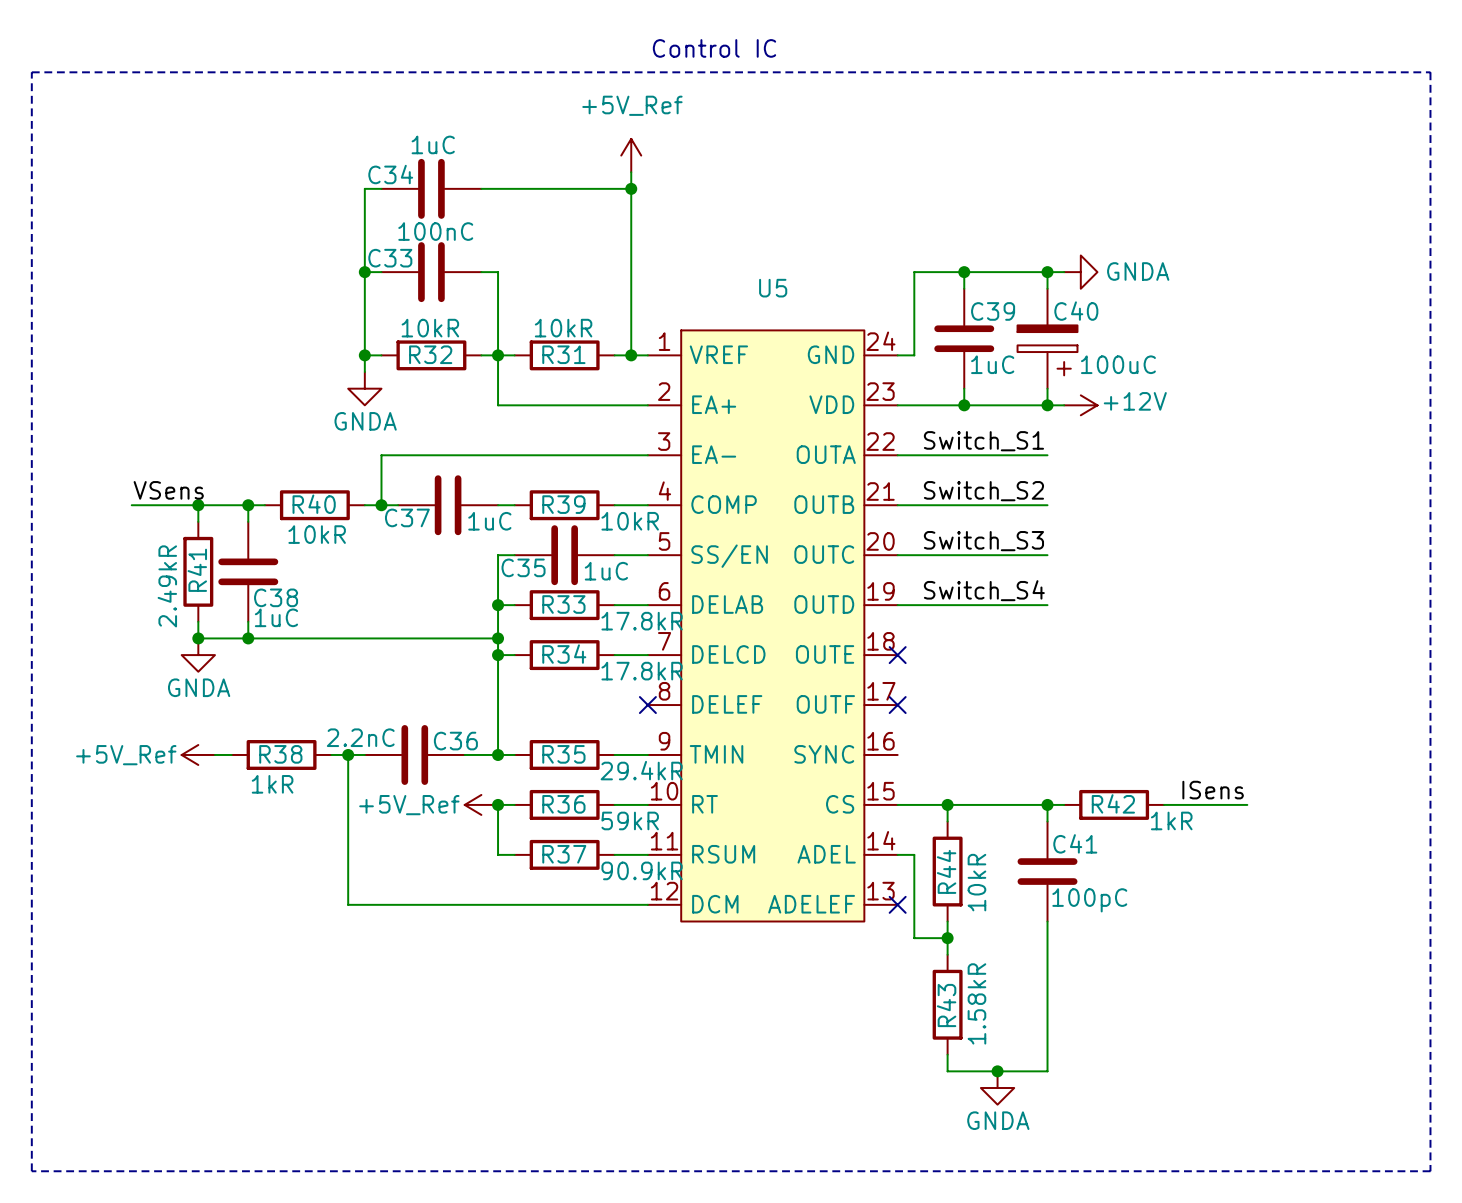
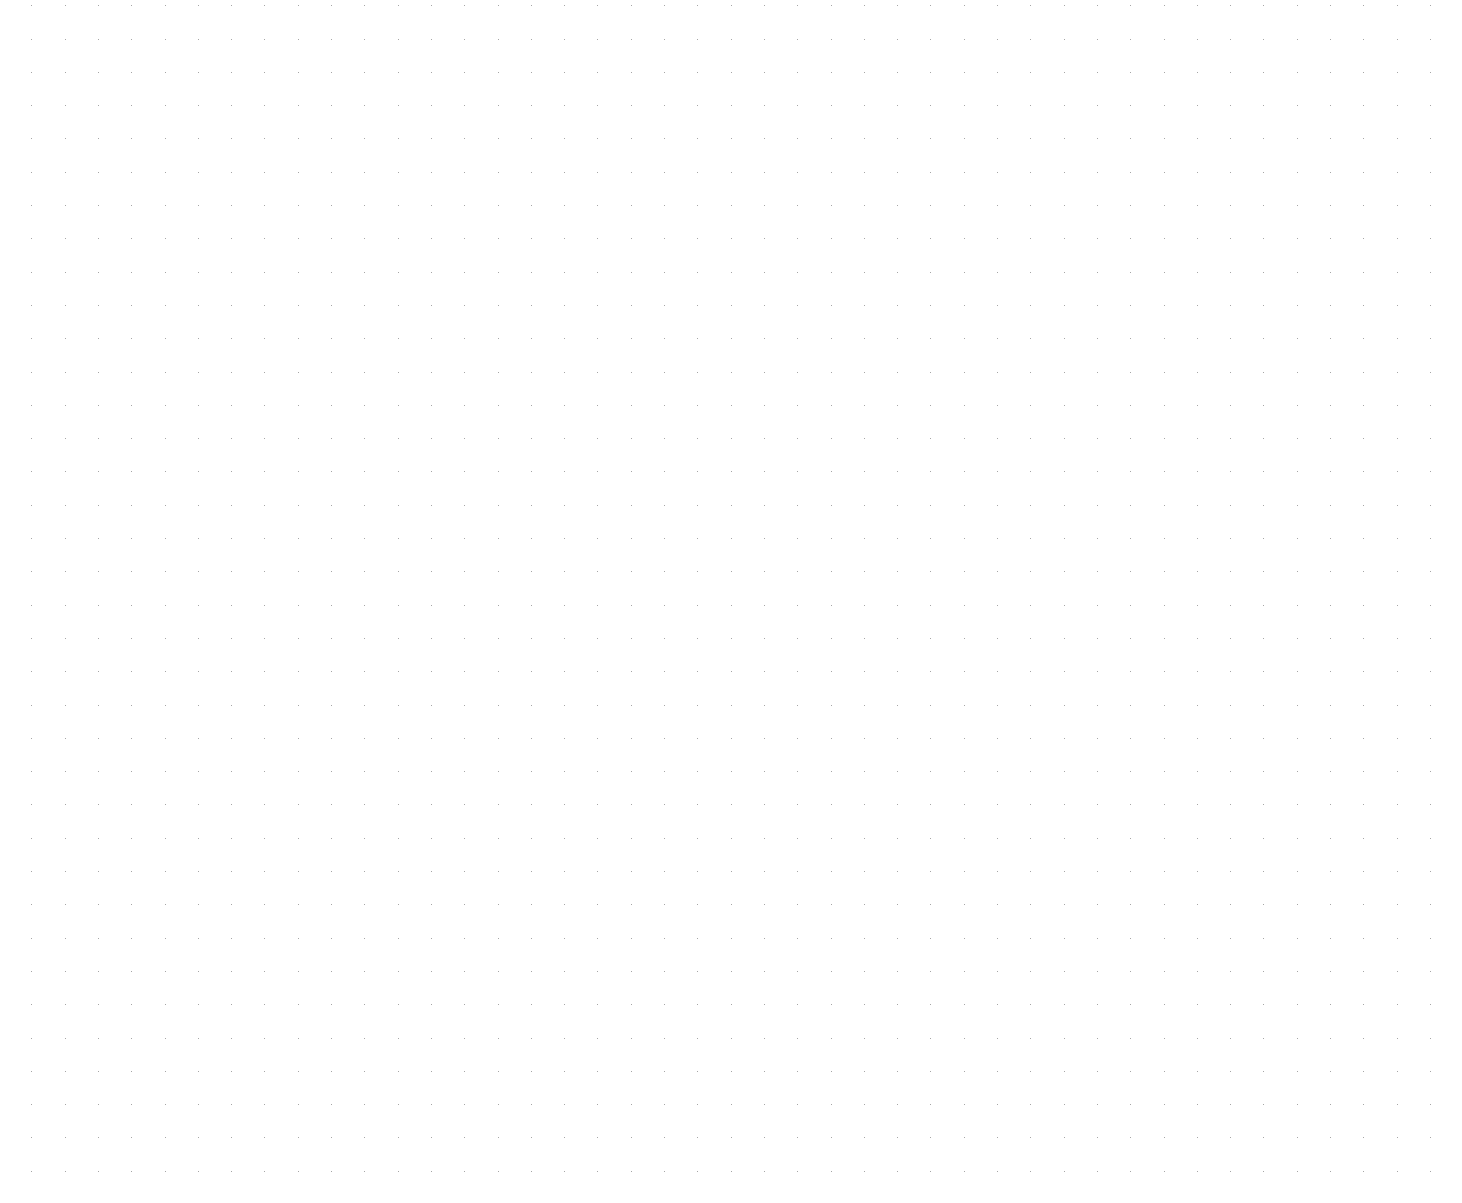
text: Control IC (714, 48) -> none
line: (31, 72) (1430, 72) (1430, 1171) (31, 1171) (31, 72) -> none
power symbol: +5V_Ref (631, 155) -> none
wire: (631, 172) (631, 355) -> none
wire: (381, 188) (364, 188) (364, 372) -> none
C34: 1uC (431, 188) -> none
wire: (481, 188) (631, 188) -> none
junction: (631, 188) -> none
wire: (364, 272) (381, 272) -> none
junction: (364, 272) -> none
C33: 100nC (431, 272) -> none
wire: (481, 272) (498, 272) (498, 405) (647, 405) -> none
wire: (964, 272) (964, 288) -> none
junction: (964, 272) -> none
wire: (1047, 272) (1047, 288) -> none
junction: (1047, 272) -> none
wire: (1064, 272) (914, 272) (914, 355) (897, 355) -> none
power symbol: GNDA (1080, 272) -> none
C39: 1uC (964, 338) -> none
C40: 100uC (1047, 338) -> none
wire: (364, 355) (381, 355) -> none
junction: (364, 355) -> none
R32: 10kR (431, 355) -> none
wire: (481, 355) (514, 355) -> none
junction: (498, 355) -> none
R31: 10kR (564, 355) -> none
wire: (614, 355) (647, 355) -> none
junction: (631, 355) -> none
power symbol: GNDA (364, 388) -> none
wire: (964, 388) (964, 405) -> none
wire: (1047, 388) (1047, 405) -> none
wire: (897, 405) (1064, 405) -> none
junction: (964, 405) -> none
junction: (1047, 405) -> none
power symbol: +12V (1080, 405) -> none
label: Switch_S1 (983, 441) -> none
wire: (647, 455) (381, 455) (381, 505) -> none
wire: (897, 455) (1047, 455) -> none
label: VSens (168, 490) -> none
label: Switch_S2 (983, 491) -> none
wire: (131, 505) (264, 505) -> none
wire: (198, 505) (198, 521) -> none
junction: (198, 505) -> none
wire: (248, 505) (248, 521) -> none
junction: (248, 505) -> none
R40: 10kR (314, 505) -> none
wire: (364, 505) (398, 505) -> none
junction: (381, 505) -> none
C37: 1uC (448, 505) -> none
wire: (498, 505) (514, 505) -> none
R39: 10kR (564, 505) -> none
wire: (614, 505) (647, 505) -> none
wire: (897, 505) (1047, 505) -> none
label: Switch_S3 (983, 541) -> none
wire: (514, 555) (498, 555) (498, 754) -> none
C35: 1uC (564, 555) -> none
wire: (614, 555) (647, 555) -> none
wire: (897, 555) (1047, 555) -> none
R41: 2.49kR (198, 571) -> none
C38: 1uC (248, 571) -> none
label: Switch_S4 (984, 590) -> none
wire: (498, 605) (514, 605) -> none
junction: (498, 605) -> none
R33: 17.8kR (564, 605) -> none
wire: (614, 605) (647, 605) -> none
wire: (897, 605) (1047, 605) -> none
wire: (198, 621) (198, 638) (498, 638) -> none
wire: (248, 621) (248, 638) -> none
U5: (772, 625) -> none
junction: (198, 638) -> none
junction: (248, 638) -> none
junction: (498, 638) -> none
power symbol: GNDA (198, 655) -> none
wire: (498, 655) (514, 655) -> none
junction: (498, 655) -> none
R34: 17.8kR (564, 655) -> none
wire: (614, 655) (647, 655) -> none
no-connect mark: (897, 655) -> none
no-connect mark: (647, 705) -> none
no-connect mark: (897, 705) -> none
power symbol: +5V_Ref (198, 754) -> none
wire: (214, 754) (231, 754) -> none
R38: 1kR (281, 754) -> none
wire: (331, 754) (364, 754) -> none
wire: (348, 754) (348, 904) (647, 904) -> none
junction: (348, 754) -> none
C36: 2.2nC (414, 754) -> none
wire: (464, 754) (514, 754) -> none
junction: (498, 754) -> none
R35: 29.4kR (564, 754) -> none
wire: (614, 754) (647, 754) -> none
label: ISens (1213, 790) -> none
power symbol: +5V_Ref (481, 804) -> none
junction: (498, 804) -> none
wire: (514, 804) (498, 804) (498, 854) (514, 854) -> none
R36: 59kR (564, 804) -> none
wire: (614, 804) (647, 804) -> none
wire: (897, 804) (1064, 804) -> none
wire: (947, 804) (947, 821) -> none
junction: (947, 804) -> none
wire: (1047, 804) (1047, 821) -> none
junction: (1047, 804) -> none
R42: 1kR (1114, 804) -> none
wire: (1164, 804) (1247, 804) -> none
R37: 90.9kR (564, 854) -> none
wire: (614, 854) (647, 854) -> none
wire: (897, 854) (914, 854) (914, 938) (947, 938) -> none
R44: 10kR (947, 871) -> none
C41: 100pC (1047, 871) -> none
no-connect mark: (897, 904) -> none
wire: (947, 921) (947, 954) -> none
wire: (1047, 921) (1047, 1071) (947, 1071) (947, 1054) -> none
junction: (947, 938) -> none
R43: 1.58kR (947, 1004) -> none
junction: (997, 1071) -> none
power symbol: GNDA (997, 1088) -> none

